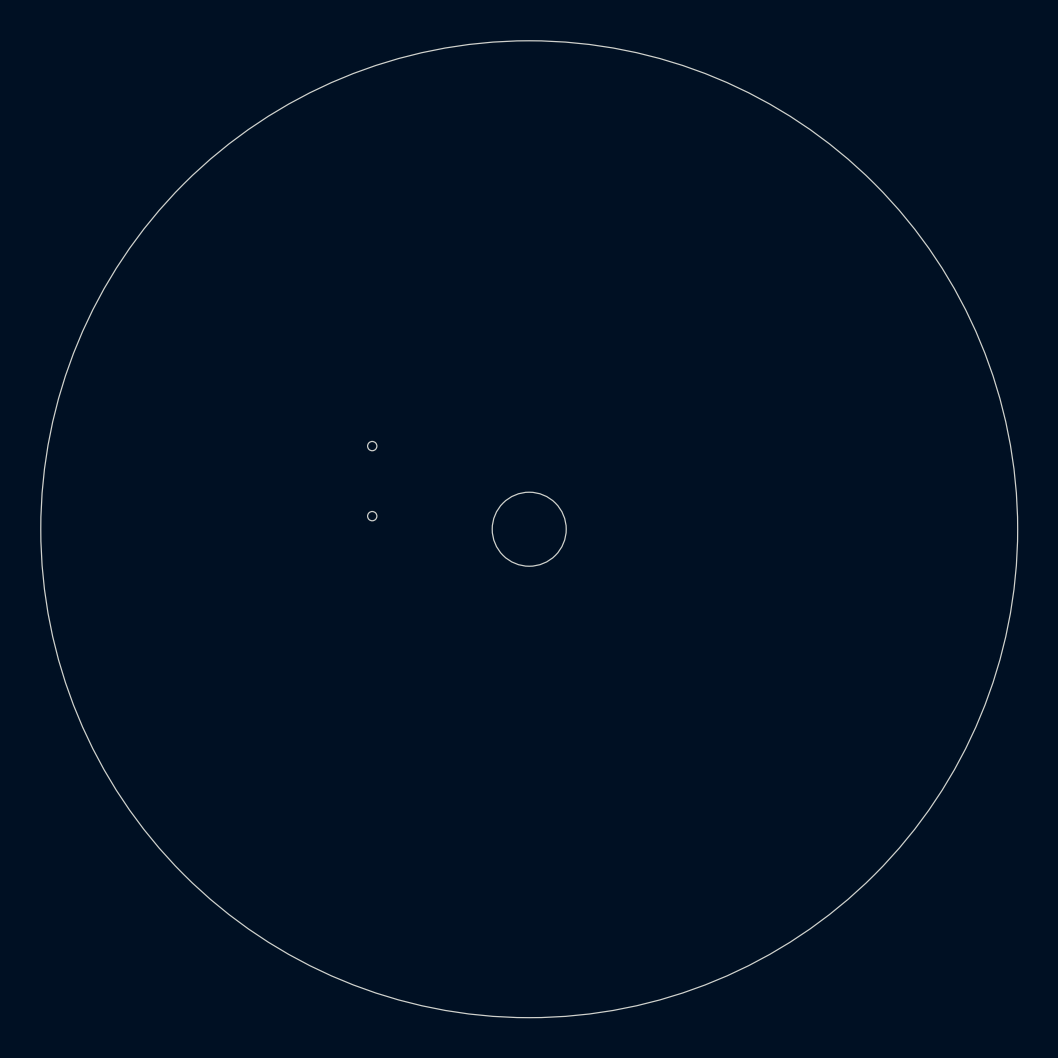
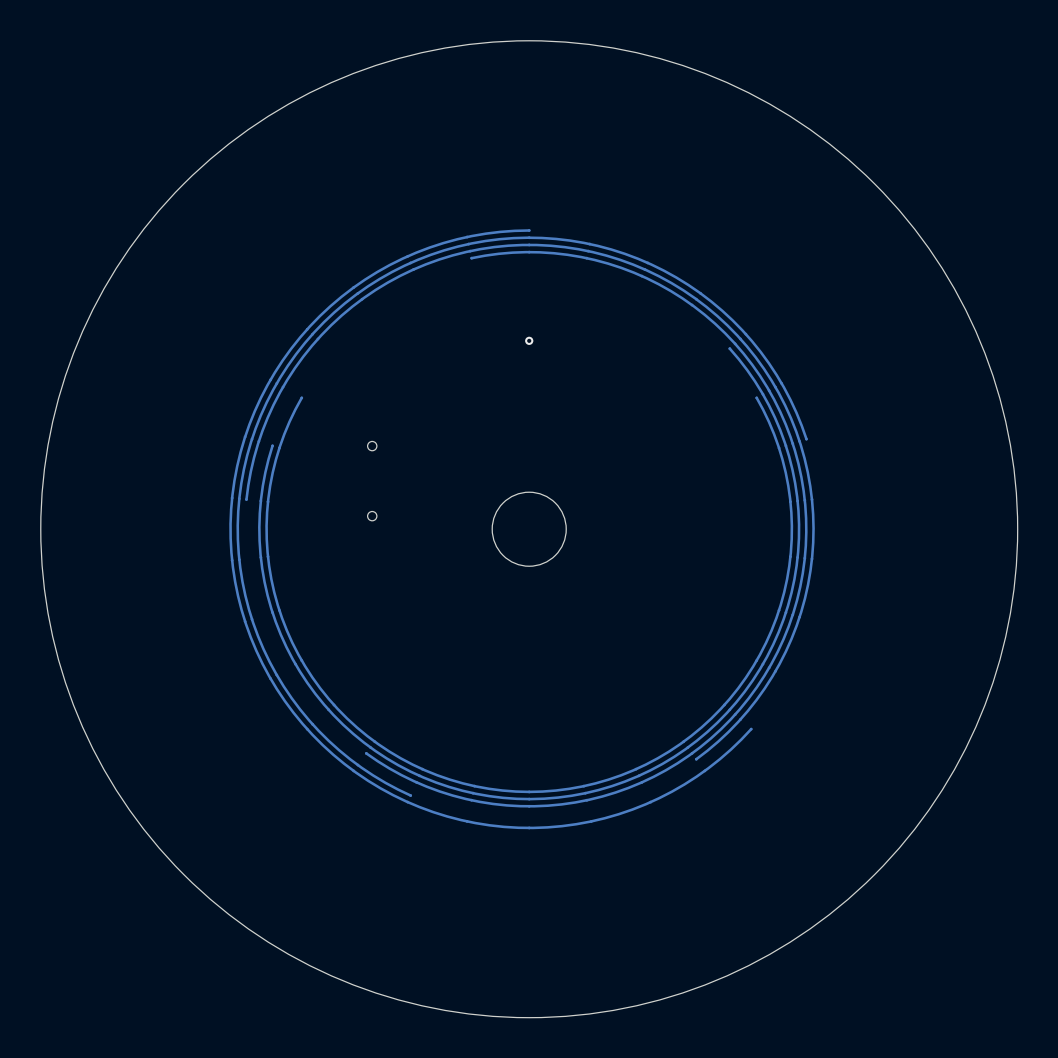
via: none -> (529, 340)
part: none -> (522, 529)

